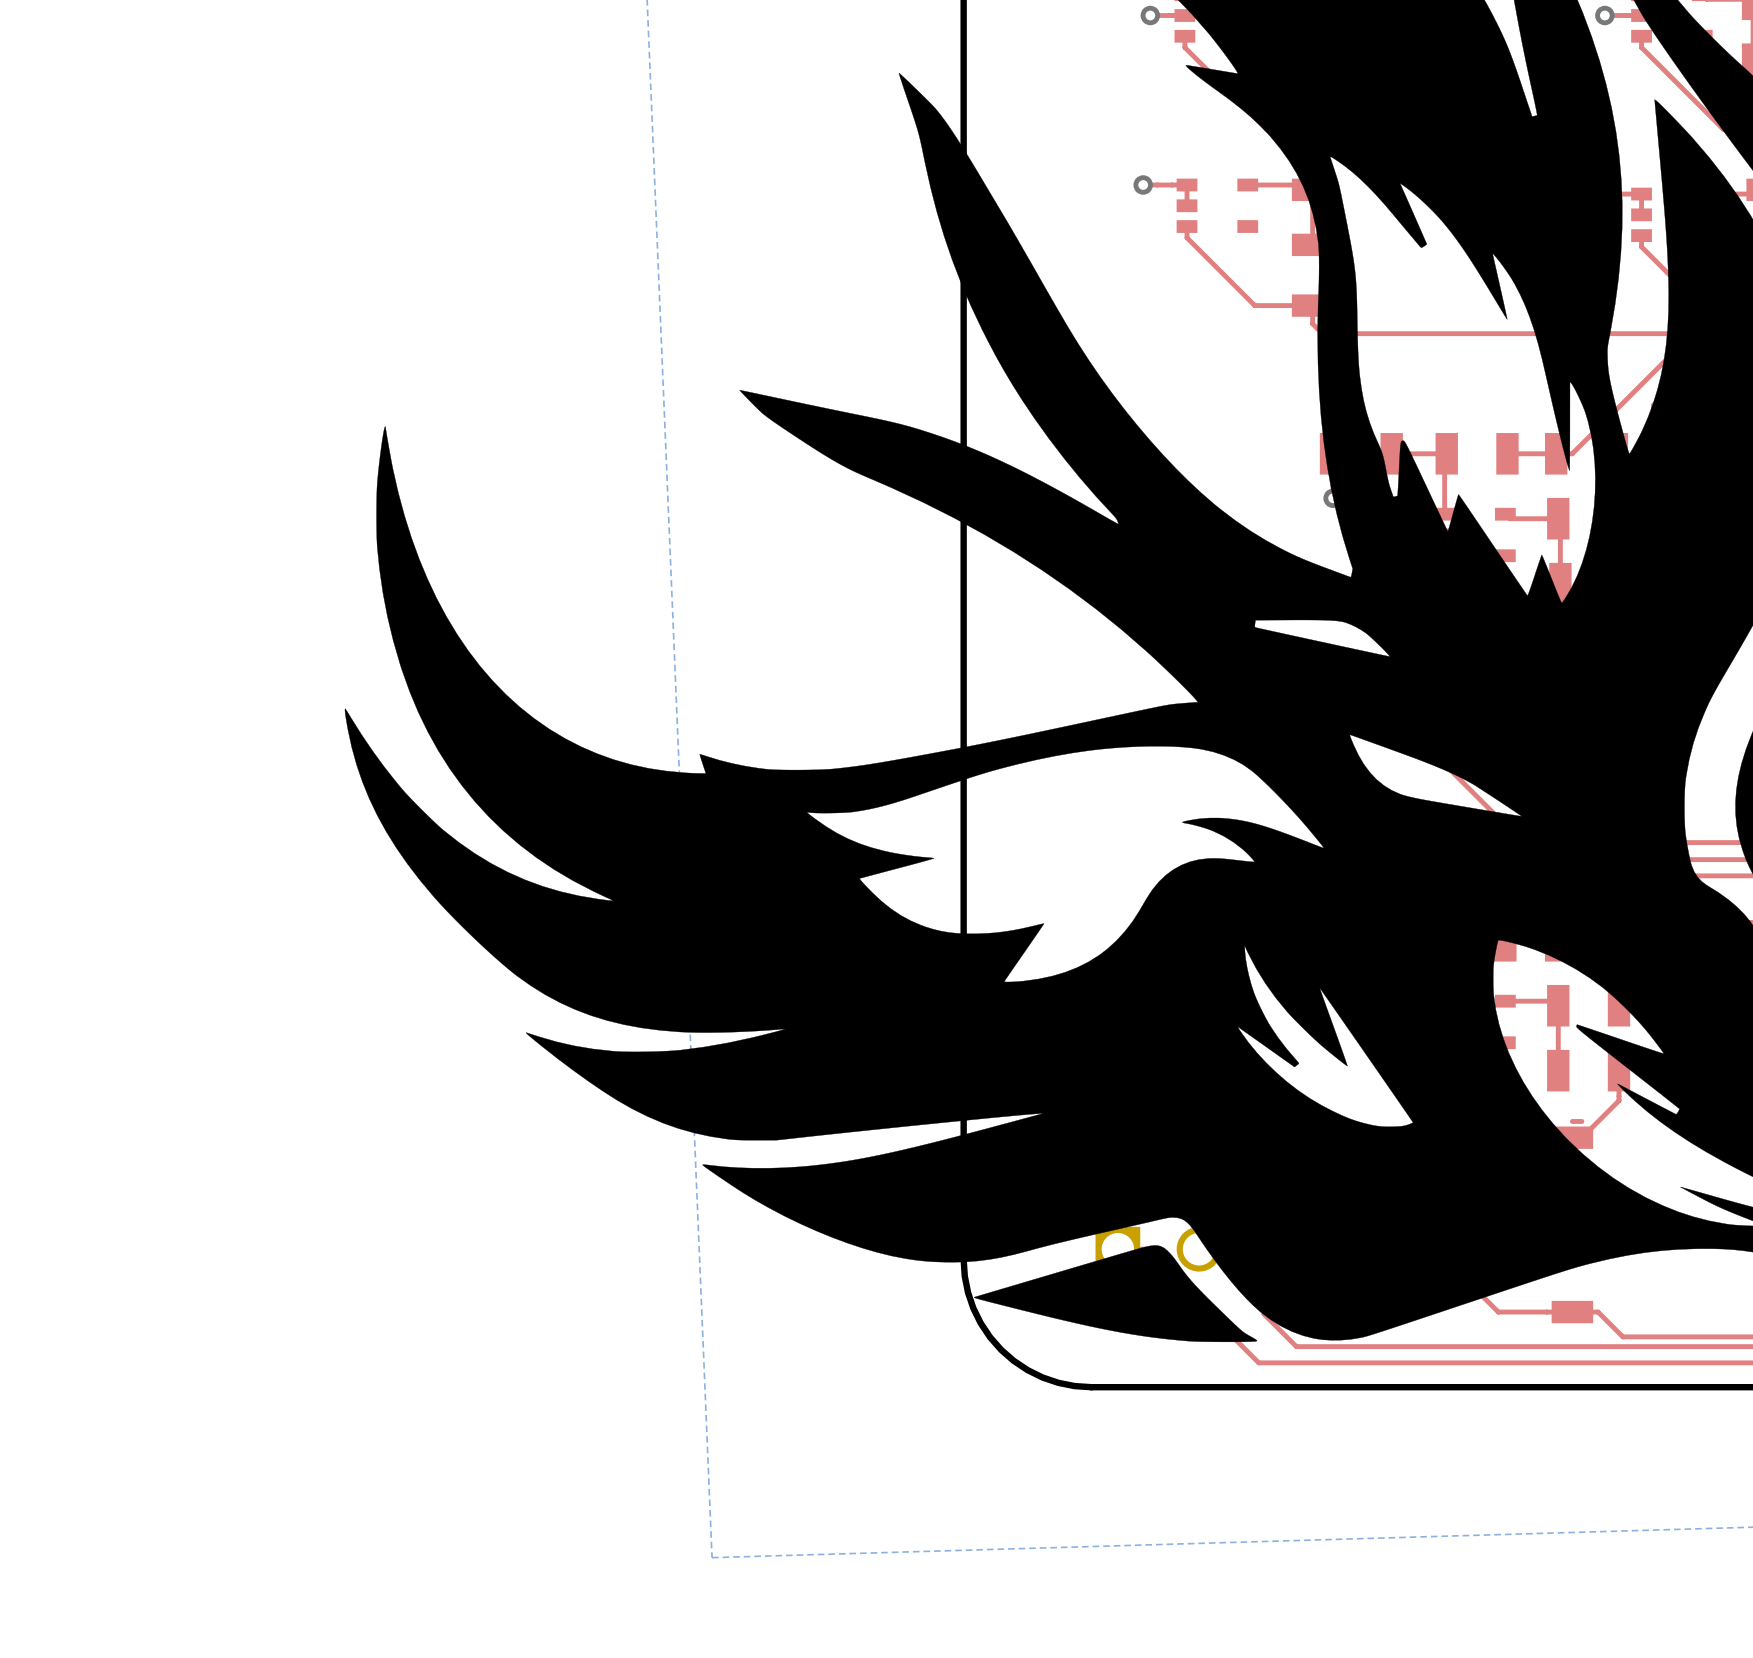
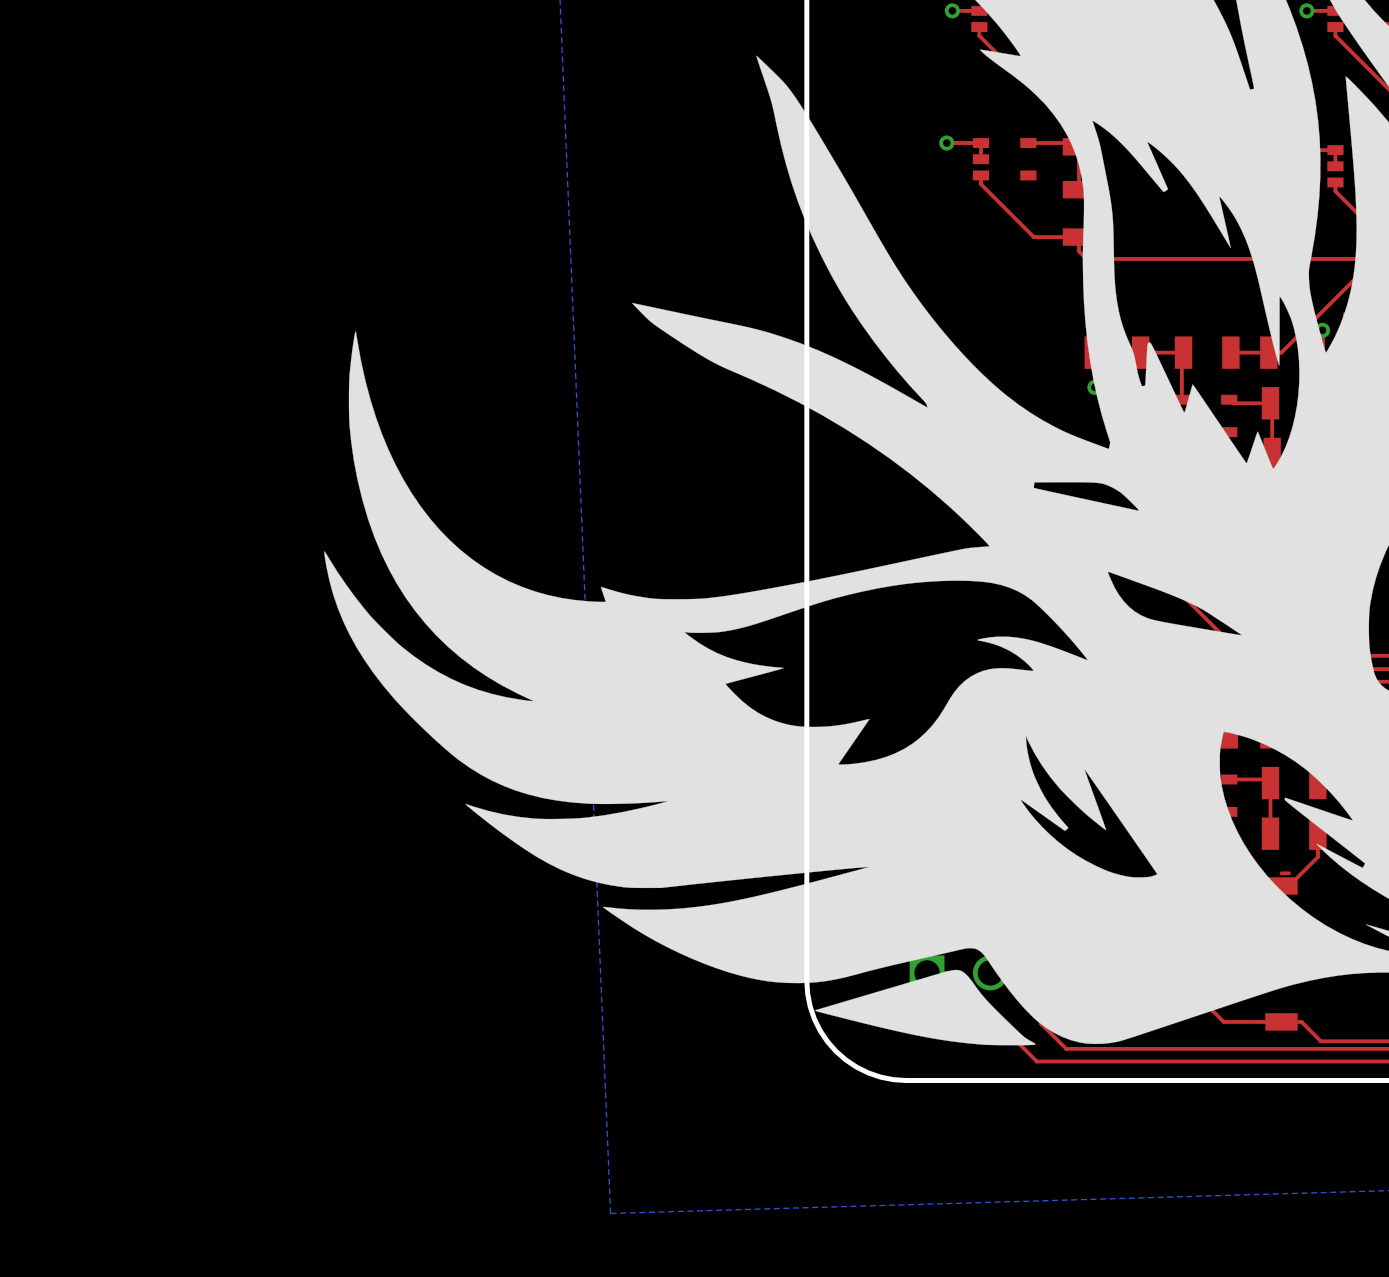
via: none -> (1322, 330)

